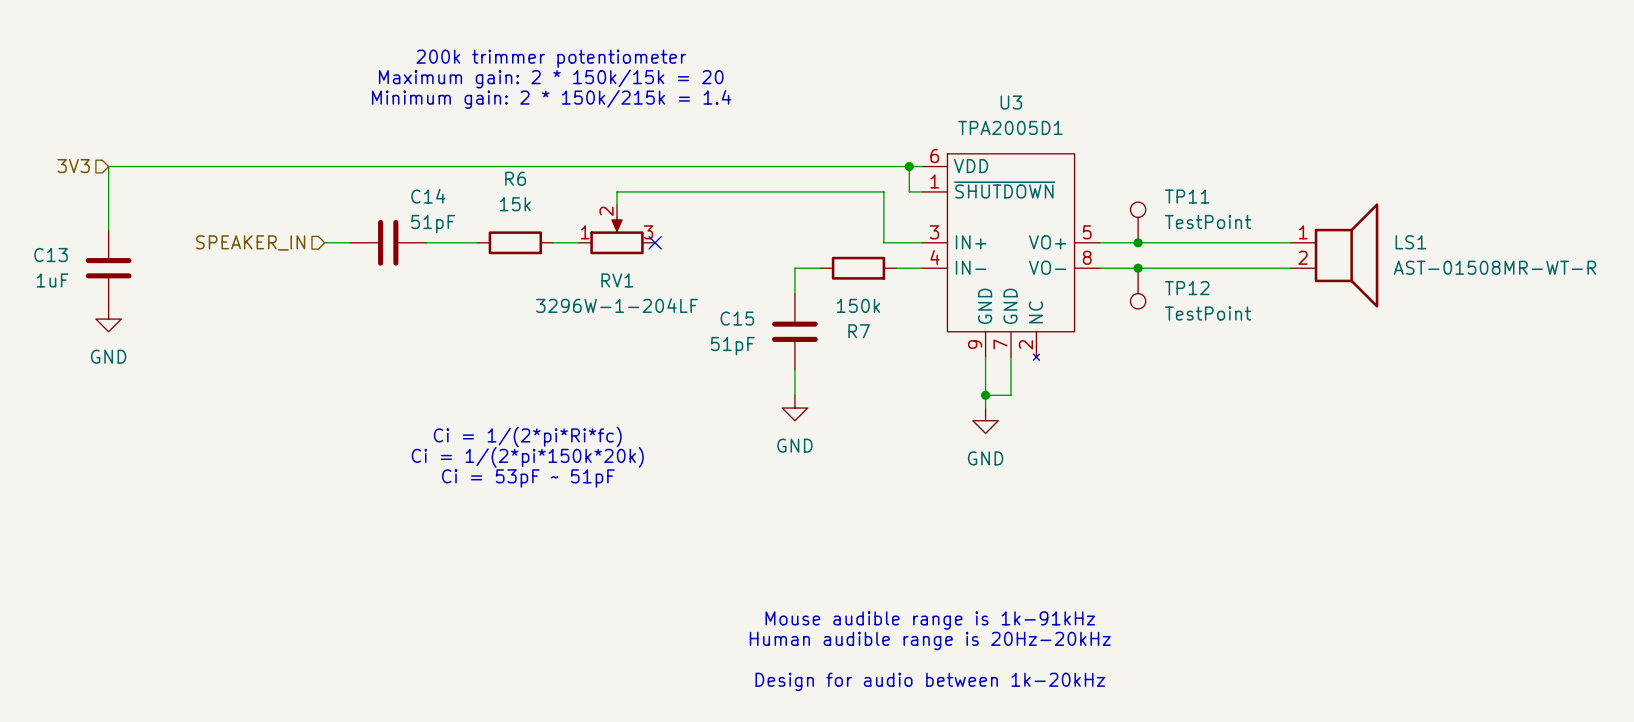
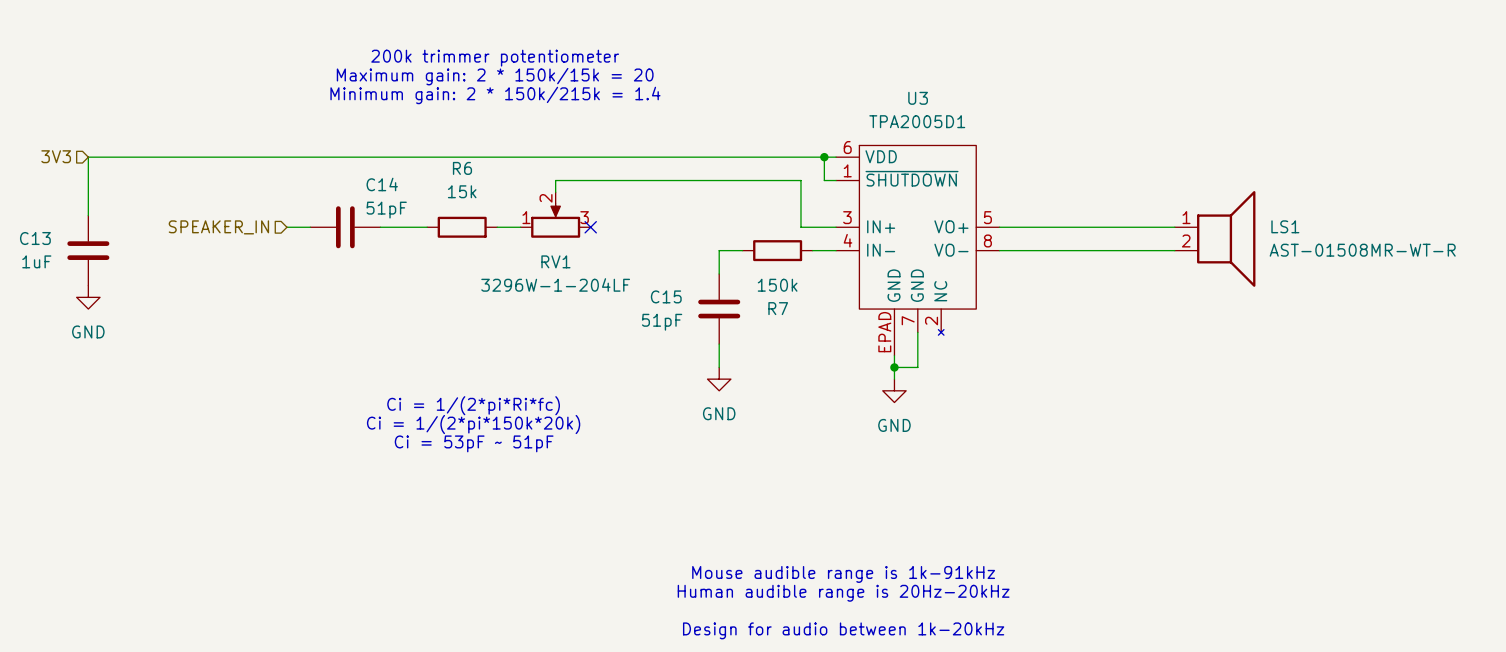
U3 symbol: [922, 153, 1100, 361] -> [836, 145, 1000, 356]
TP11: TestPoint (1138, 222) -> none
junction: (1138, 242) -> none
junction: (1138, 268) -> none
TP12: TestPoint (1138, 288) -> none

